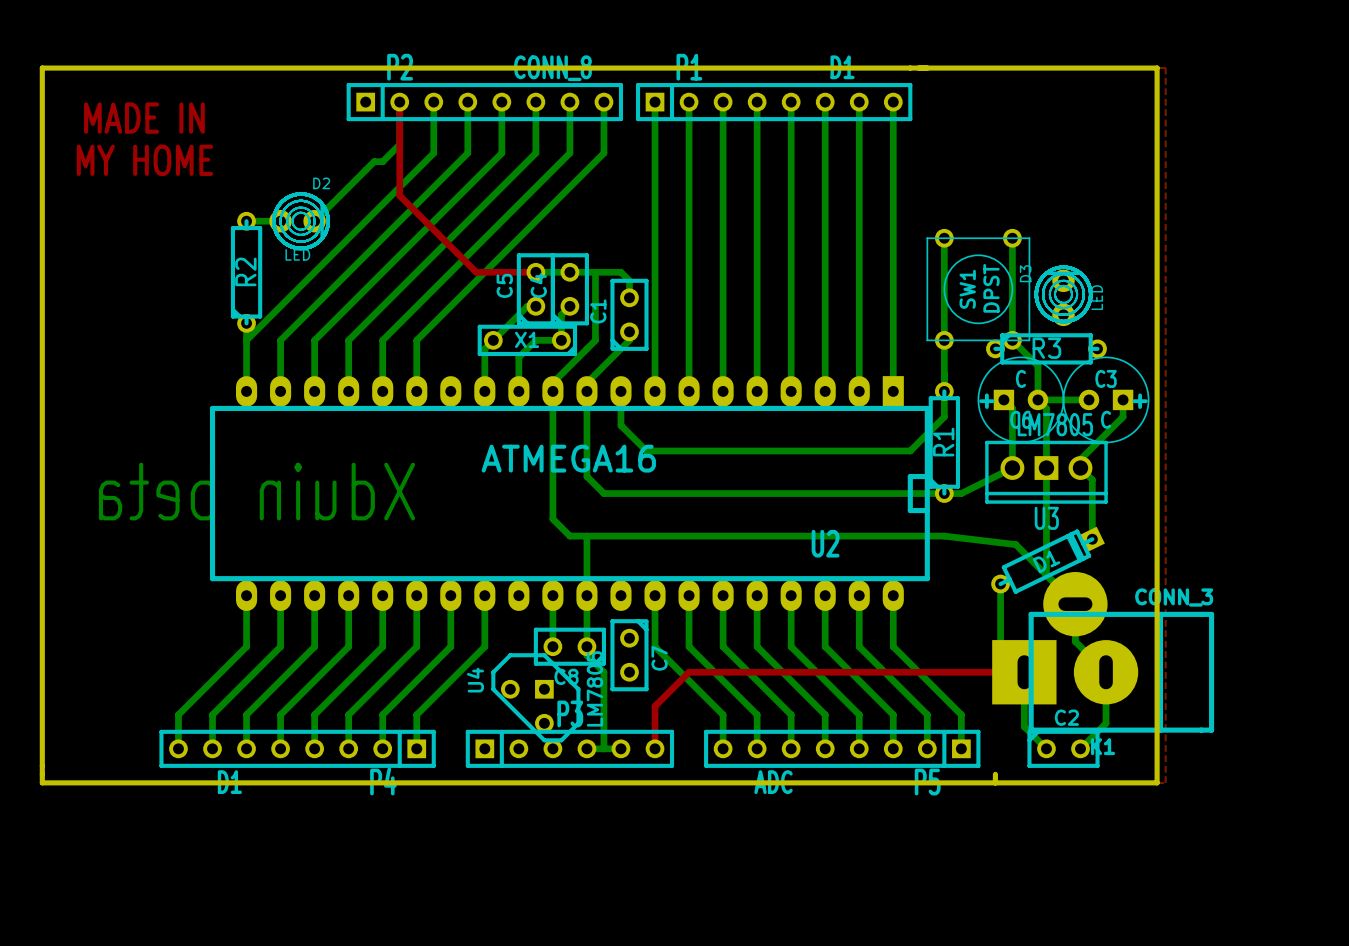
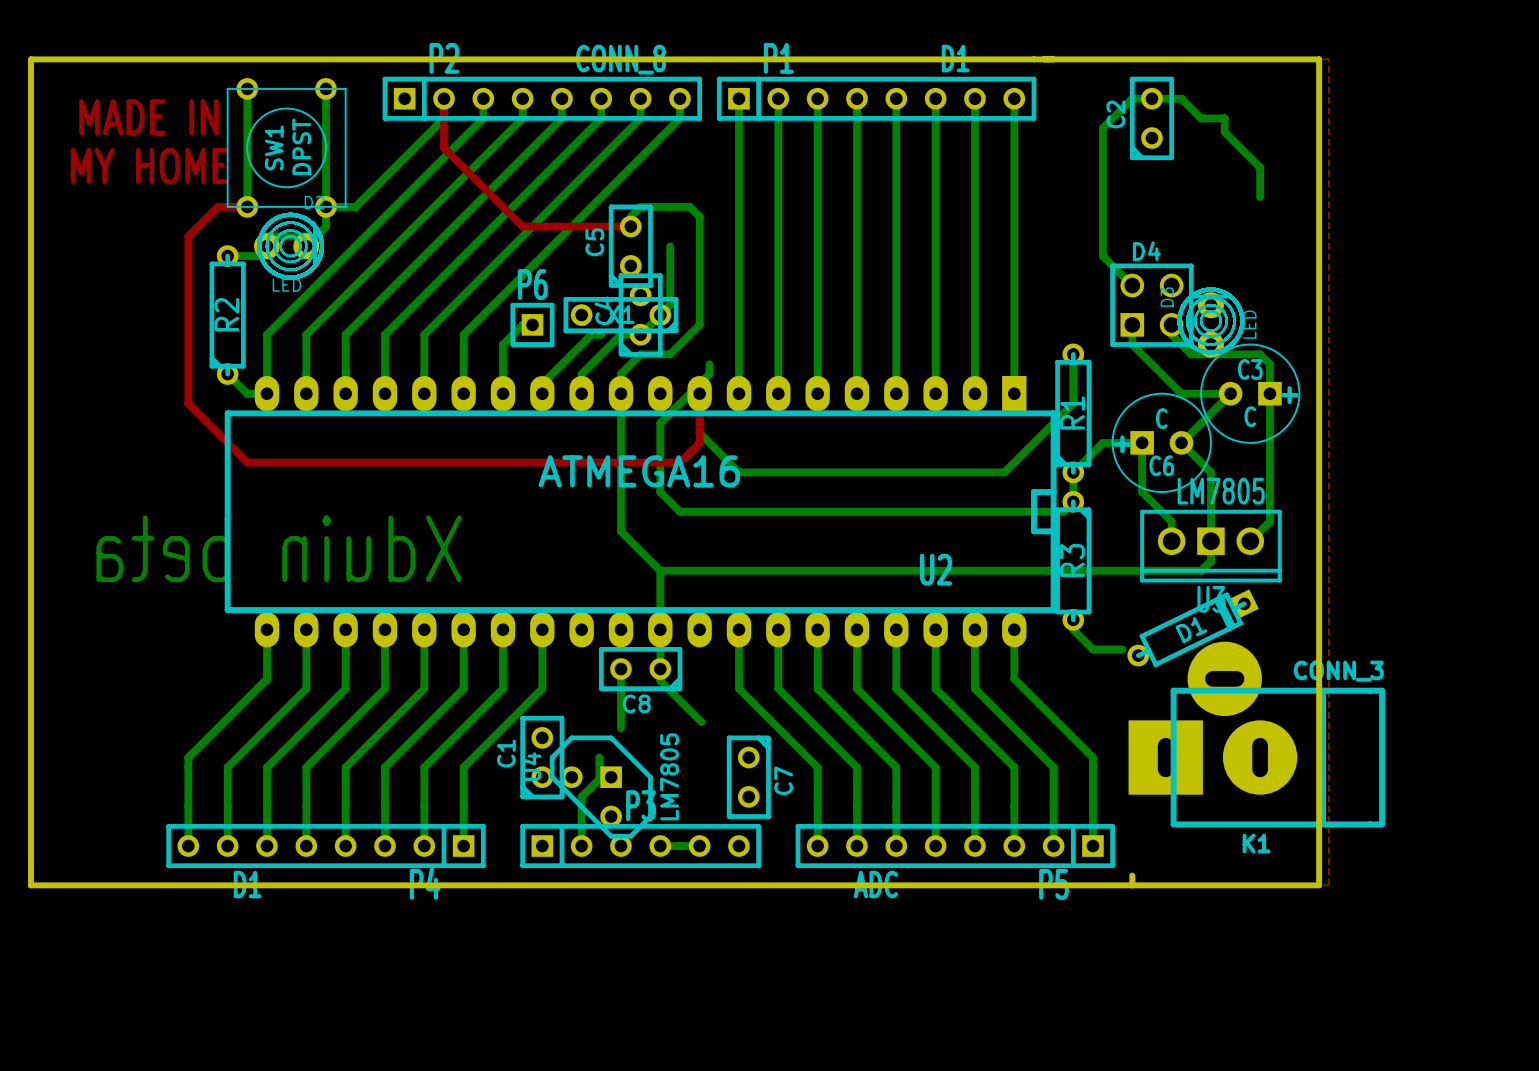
bottom track: none -> (247, 88) (247, 206)
bottom track: none -> (325, 88) (325, 226) (306, 246)
bottom track: (399, 119) (399, 144) (382, 161) (374, 161) (314, 221) -> (443, 118) (355, 206) (325, 206)
bottom track: (433, 119) (433, 153) -> (522, 118) (483, 157)
bottom track: none -> (483, 118) (266, 334) (266, 354)
bottom track: (467, 119) (467, 153) -> (561, 118) (522, 157)
bottom track: (501, 119) (501, 153) -> (601, 118) (561, 157)
bottom track: (535, 119) (535, 153) -> (640, 118) (601, 157)
bottom track: (569, 119) (569, 153) -> (679, 118) (640, 157)
bottom track: (603, 119) (603, 153) (416, 340) -> (463, 334) (463, 374)
top track: (399, 144) (399, 195) (476, 272) (535, 272) -> (443, 147) (522, 226) (630, 226)
bottom track: none -> (1260, 197) (1260, 167) (1224, 132) (1224, 118) (1201, 118) (1181, 98) (1132, 98) (1102, 128) (1102, 256) (1132, 285)
top track: none -> (247, 206) (217, 206) (188, 236) (188, 403) (247, 462) (679, 462) (699, 442) (699, 393)
bottom track: none -> (630, 226) (630, 216) (640, 206) (689, 206) (699, 216) (699, 324) (670, 354) (640, 354) (620, 374) (620, 423)
D2 position: (299, 221) -> (289, 246)
bottom track: none -> (266, 246) (257, 256) (227, 256)
bottom track: none -> (670, 246) (670, 295)
bottom track: (944, 238) (944, 323) -> none
bottom track: (1012, 238) (1012, 340) (1037, 365) (1037, 399) (1089, 399) -> none
R2 position: (246, 272) -> (227, 315)
bottom track: (535, 272) (620, 272) (629, 280) (629, 297) -> none
bottom track: (595, 280) (595, 340) (552, 382) -> (670, 305) (640, 334) (620, 334) (581, 374) (581, 393)
D4: none -> (1151, 305)
C5 position: (535, 289) -> (630, 246)
SW1 position: (978, 289) -> (286, 147)
bottom track: none -> (532, 324) (522, 324) (502, 344) (502, 393)
P6: none -> (532, 324)
bottom track: none -> (1132, 324) (1132, 344) (1181, 393) (1230, 393) (1181, 442)
bottom track: none -> (1171, 324) (1171, 334) (1191, 354) (1260, 354) (1269, 364) (1269, 521) (1250, 541)
bottom track: (280, 306) (246, 340) -> (306, 334) (306, 374)
bottom track: (314, 306) (280, 340) -> (345, 334) (345, 374)
bottom track: (348, 306) (314, 340) -> none
bottom track: (382, 306) (348, 340) -> (384, 334) (384, 374)
bottom track: (416, 306) (382, 340) -> (424, 334) (424, 374)
bottom track: (569, 306) (561, 314) (561, 340) (535, 340) (518, 357) (518, 391) -> none
C1 position: (629, 314) -> (542, 757)
X1 position: (527, 340) -> (620, 315)
R3 rotation: 0° (1046, 348) -> 90° clockwise (1073, 560)
R3 position: (1046, 348) -> (1073, 560)
bottom track: (246, 357) (246, 391) -> (266, 393) (247, 393) (227, 374)
bottom track: (280, 357) (280, 391) -> (306, 629) (306, 669)
bottom track: (314, 357) (314, 391) -> (345, 629) (345, 669)
bottom track: (348, 357) (348, 391) -> (384, 629) (384, 669)
bottom track: (382, 357) (382, 391) -> (424, 629) (424, 669)
bottom track: (416, 357) (416, 391) -> (463, 629) (463, 669)
bottom track: (484, 357) (484, 391) -> (542, 629) (542, 669)
bottom track: (655, 357) (655, 391) -> (738, 629) (738, 669)
bottom track: (689, 357) (689, 391) -> (778, 629) (778, 669)
bottom track: (723, 357) (723, 391) -> (817, 629) (817, 669)
bottom track: (757, 357) (757, 391) -> (856, 629) (856, 669)
bottom track: (791, 357) (791, 391) -> (896, 629) (896, 669)
bottom track: (825, 357) (825, 391) -> (935, 629) (935, 669)
bottom track: (859, 357) (859, 391) -> (974, 629) (974, 669)
bottom track: (893, 357) (893, 391) -> (1014, 629) (1014, 669)
bottom track: (944, 365) (944, 416) (910, 450) (646, 450) (620, 425) (620, 391) -> (1073, 403) (1004, 472) (738, 472) (699, 433) (699, 393)
bottom track: (1003, 399) (1012, 408) (1012, 468) (961, 493) (603, 493) (586, 476) (586, 442) -> (1171, 541) (1171, 521) (1142, 492) (1142, 442) (1102, 442) (1073, 472) (1073, 501) (1063, 511) (679, 511) (660, 492)
C3 position: (1106, 399) -> (1250, 393)
bottom track: (1123, 399) (1123, 416) (1080, 459) (1080, 468) (1092, 479) (1092, 539) -> none
bottom track: (1046, 408) (1046, 575) -> (1191, 452) (1210, 472) (1210, 560) (1201, 570) (660, 570)
R1 position: (944, 442) -> (1073, 413)
U3 position: (1046, 472) -> (1210, 546)
bottom track: (552, 476) (552, 519) (569, 536) (944, 536) (1015, 544) (1075, 604) (1075, 641) (1106, 672) (1106, 723) (1080, 748) -> (620, 531) (660, 570)
U2 position: (569, 493) -> (640, 511)
bottom track: none -> (660, 570) (660, 600)
bottom track: none -> (1073, 619) (1073, 629) (1092, 649) (1122, 649)
bottom track: none -> (266, 629) (266, 669)
bottom track: none -> (502, 629) (502, 669)
bottom track: (1000, 584) (1000, 648) (1024, 672) (1024, 726) (1046, 748) -> none
bottom track: (246, 604) (246, 646) -> (266, 678) (188, 757) (188, 806)
bottom track: (893, 604) (893, 646) -> (1014, 678) (1092, 757) (1092, 806)
bottom track: (586, 605) (586, 655) (603, 672) (603, 748) -> (660, 680) (701, 722)
bottom track: (280, 612) (280, 646) -> (306, 688) (266, 728)
bottom track: (314, 612) (314, 646) -> (345, 688) (306, 728)
bottom track: (348, 612) (348, 646) -> (424, 688) (384, 728)
bottom track: (382, 612) (382, 646) -> (463, 688) (424, 728)
bottom track: (416, 612) (416, 646) -> (502, 688) (463, 728)
bottom track: (450, 612) (450, 646) -> (542, 688) (502, 728)
bottom track: (484, 612) (484, 646) (416, 714) -> (463, 767) (463, 806)
bottom track: (655, 612) (655, 646) (723, 714) -> none
bottom track: (689, 612) (689, 646) -> (738, 688) (778, 728)
bottom track: none -> (778, 688) (817, 728)
bottom track: (723, 612) (723, 646) -> (817, 688) (856, 728)
bottom track: (757, 612) (757, 646) -> (856, 688) (896, 728)
bottom track: (791, 612) (791, 646) -> (896, 688) (935, 728)
bottom track: (825, 612) (825, 646) -> (935, 688) (974, 728)
bottom track: (859, 612) (859, 646) -> (974, 688) (1014, 728)
C8 position: (569, 646) -> (640, 669)
C7 position: (629, 655) -> (748, 777)
bottom track: none -> (599, 757) (599, 779) (581, 796) (581, 846)
top track: (1024, 672) (689, 672) (655, 706) (655, 748) -> none
bottom track: (212, 680) (178, 714) -> (227, 767) (227, 806)
bottom track: (246, 680) (212, 714) -> (384, 688) (345, 728)
bottom track: (280, 680) (246, 714) -> (266, 767) (266, 806)
bottom track: (314, 680) (280, 714) -> (306, 767) (306, 806)
bottom track: (348, 680) (314, 714) -> (345, 767) (345, 806)
bottom track: (382, 680) (348, 714) -> (384, 767) (384, 806)
bottom track: (416, 680) (382, 714) -> (424, 767) (424, 806)
bottom track: (723, 680) (757, 714) -> (817, 767) (817, 806)
bottom track: (757, 680) (791, 714) -> (856, 767) (856, 806)
bottom track: (791, 680) (825, 714) -> (896, 767) (896, 806)
bottom track: (825, 680) (859, 714) -> (935, 767) (935, 806)
bottom track: (859, 680) (893, 714) -> (974, 767) (974, 806)
bottom track: (893, 680) (927, 714) -> (1014, 767) (1014, 806)
bottom track: (927, 680) (961, 714) -> (1053, 767) (1053, 806)
C2 rotation: 0° (1063, 748) -> 90° counterclockwise (1151, 118)
C2 position: (1063, 748) -> (1151, 118)

